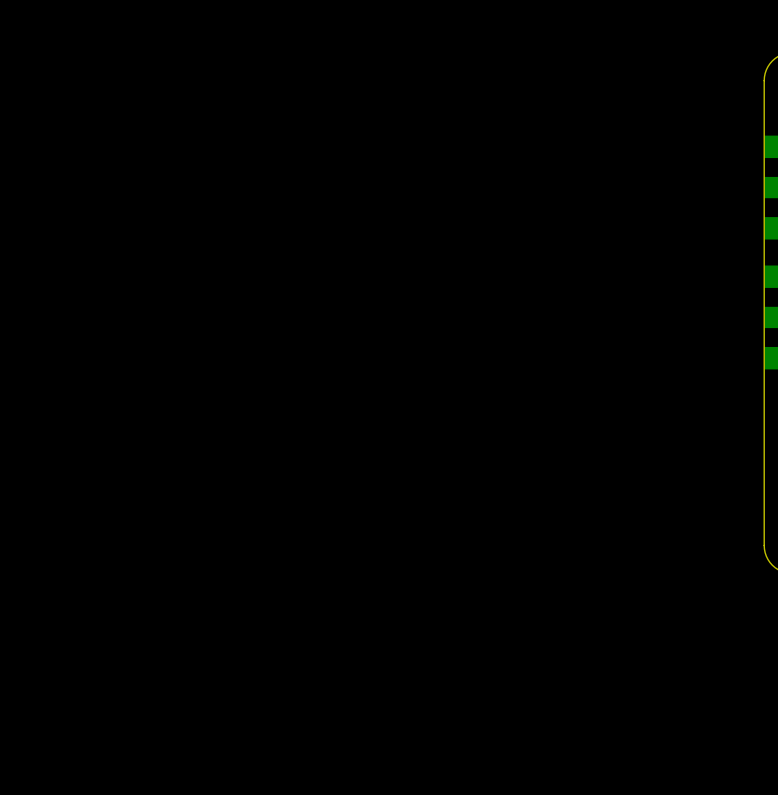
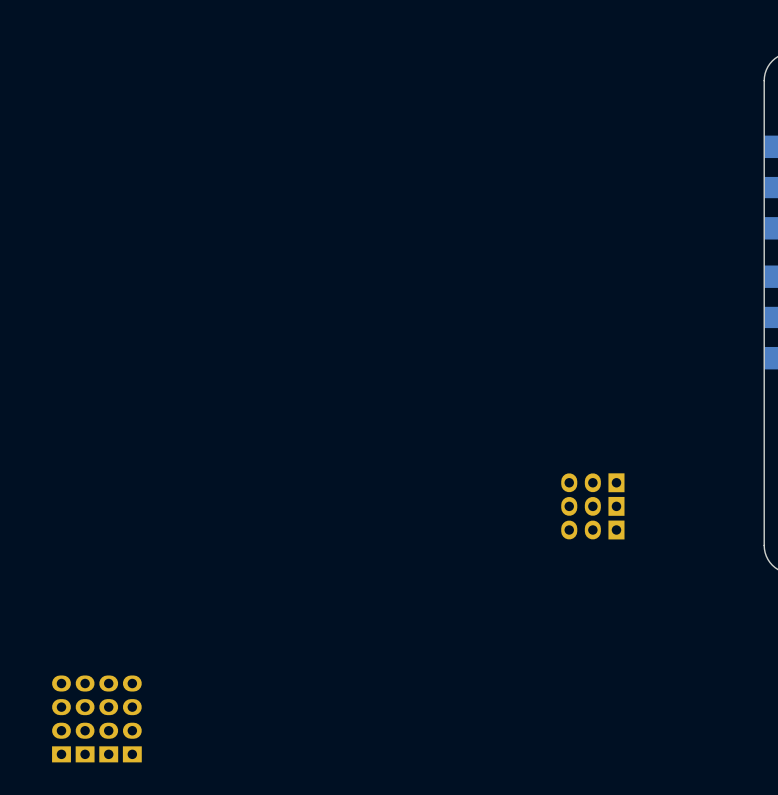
part: none -> (592, 482)
part: none -> (592, 506)
part: none -> (592, 530)
part: none -> (61, 718)
part: none -> (85, 718)
part: none -> (108, 718)
part: none -> (132, 718)

